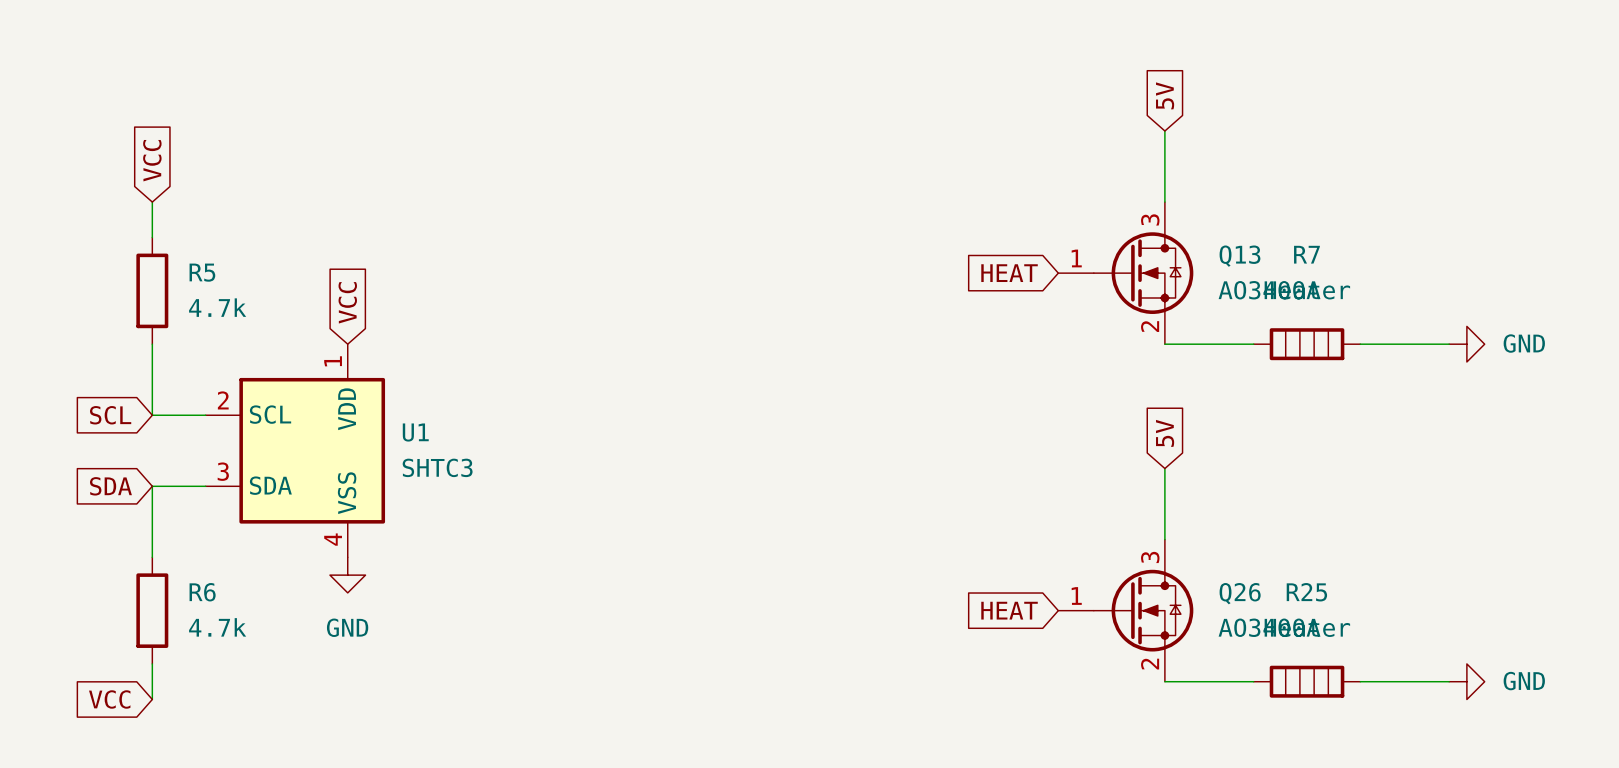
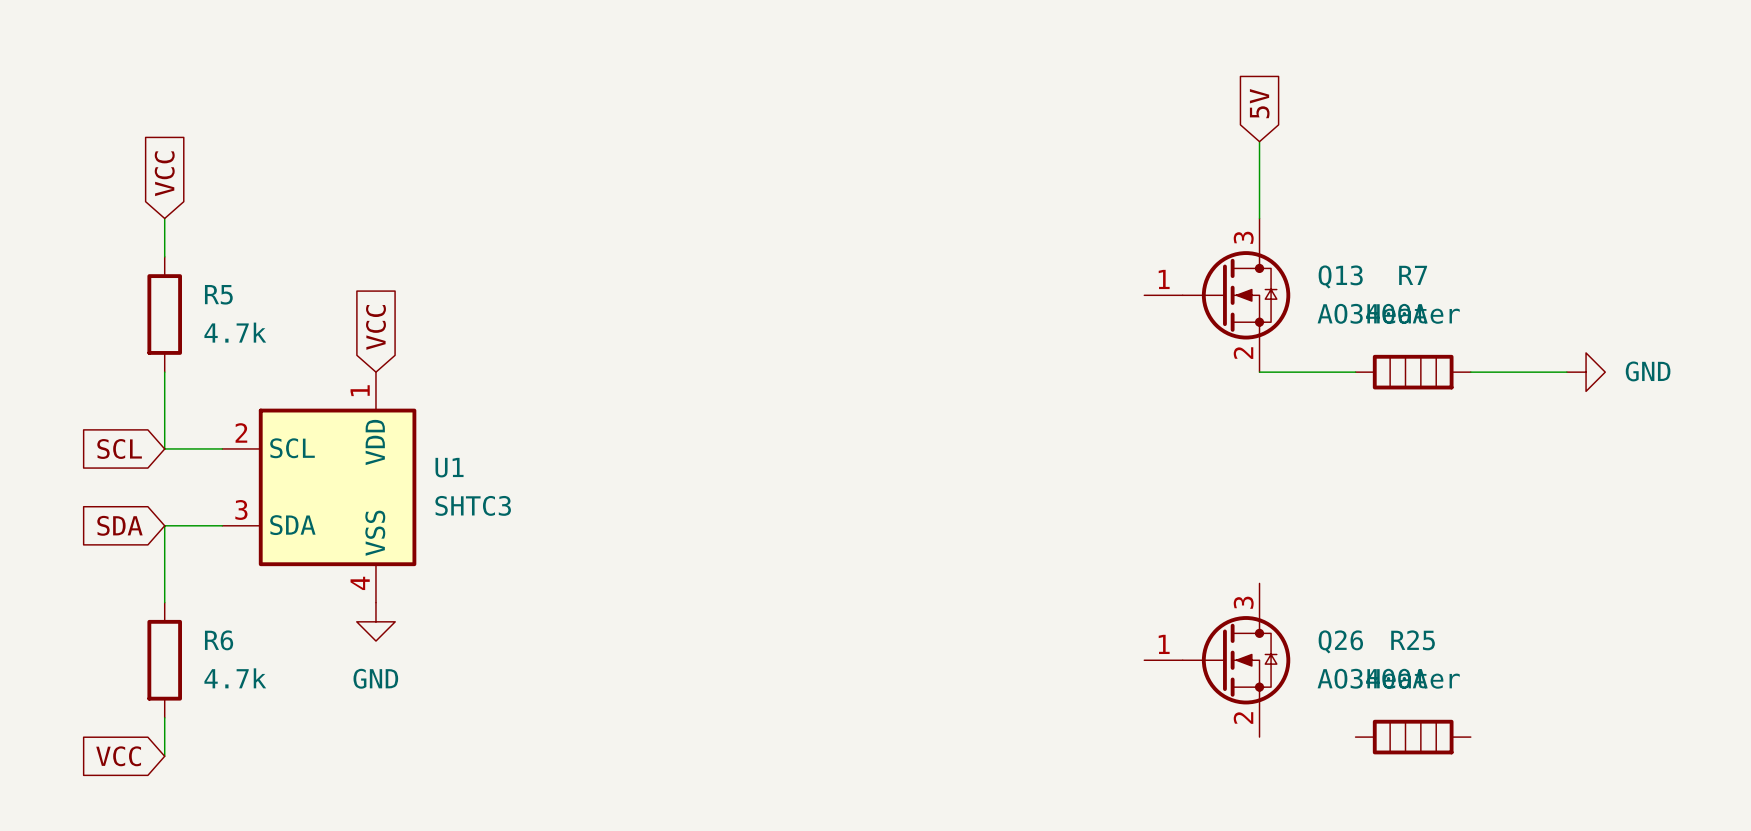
global label: HEAT (1009, 273) -> none
global label: 5V (1165, 433) -> none
wire: (1164, 468) (1164, 539) -> none
global label: HEAT (1009, 610) -> none
wire: (1164, 681) (1253, 681) -> none
wire: (1360, 681) (1449, 681) -> none
power symbol: GND (1466, 681) -> none

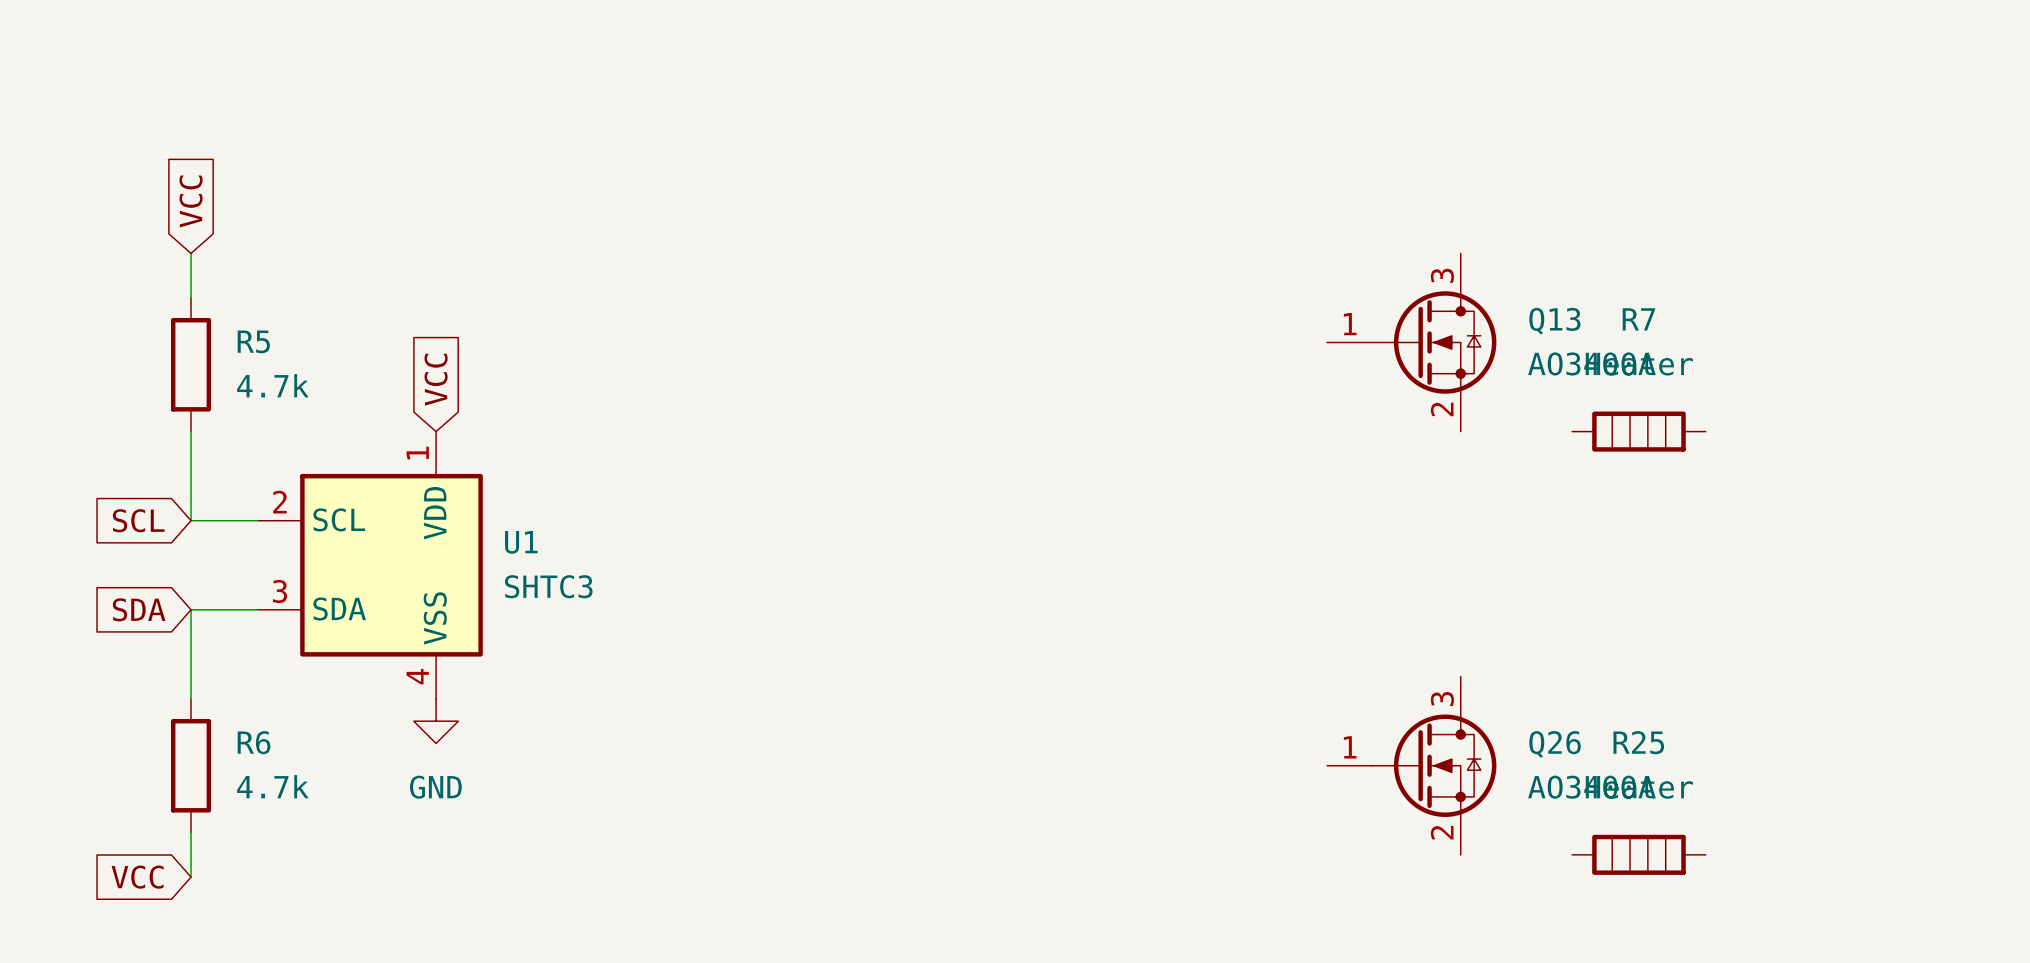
global label: 5V (1259, 103) -> none
wire: (1259, 141) (1259, 218) -> none
wire: (1259, 372) (1355, 372) -> none
wire: (1470, 372) (1566, 372) -> none
power symbol: GND (1586, 372) -> none

